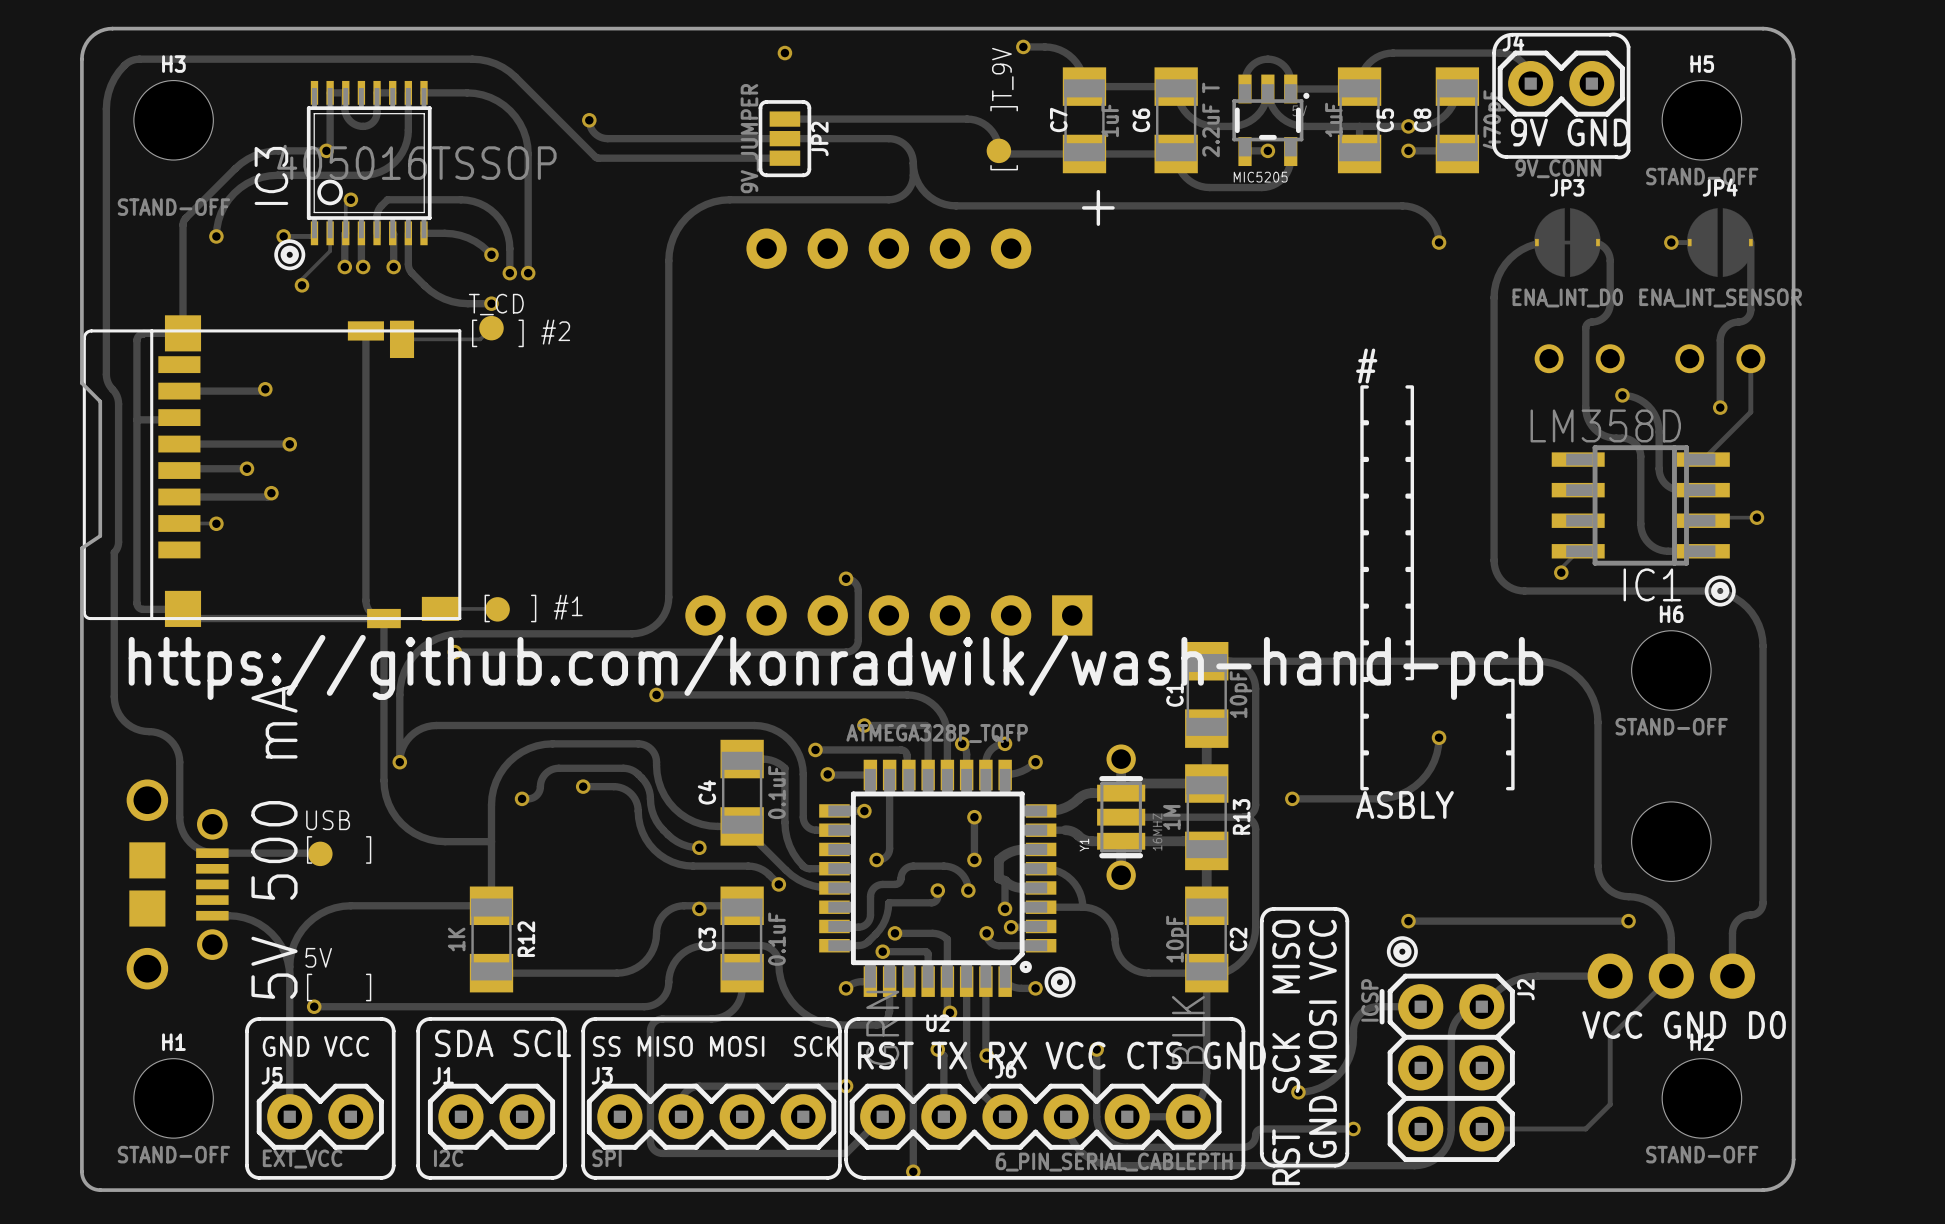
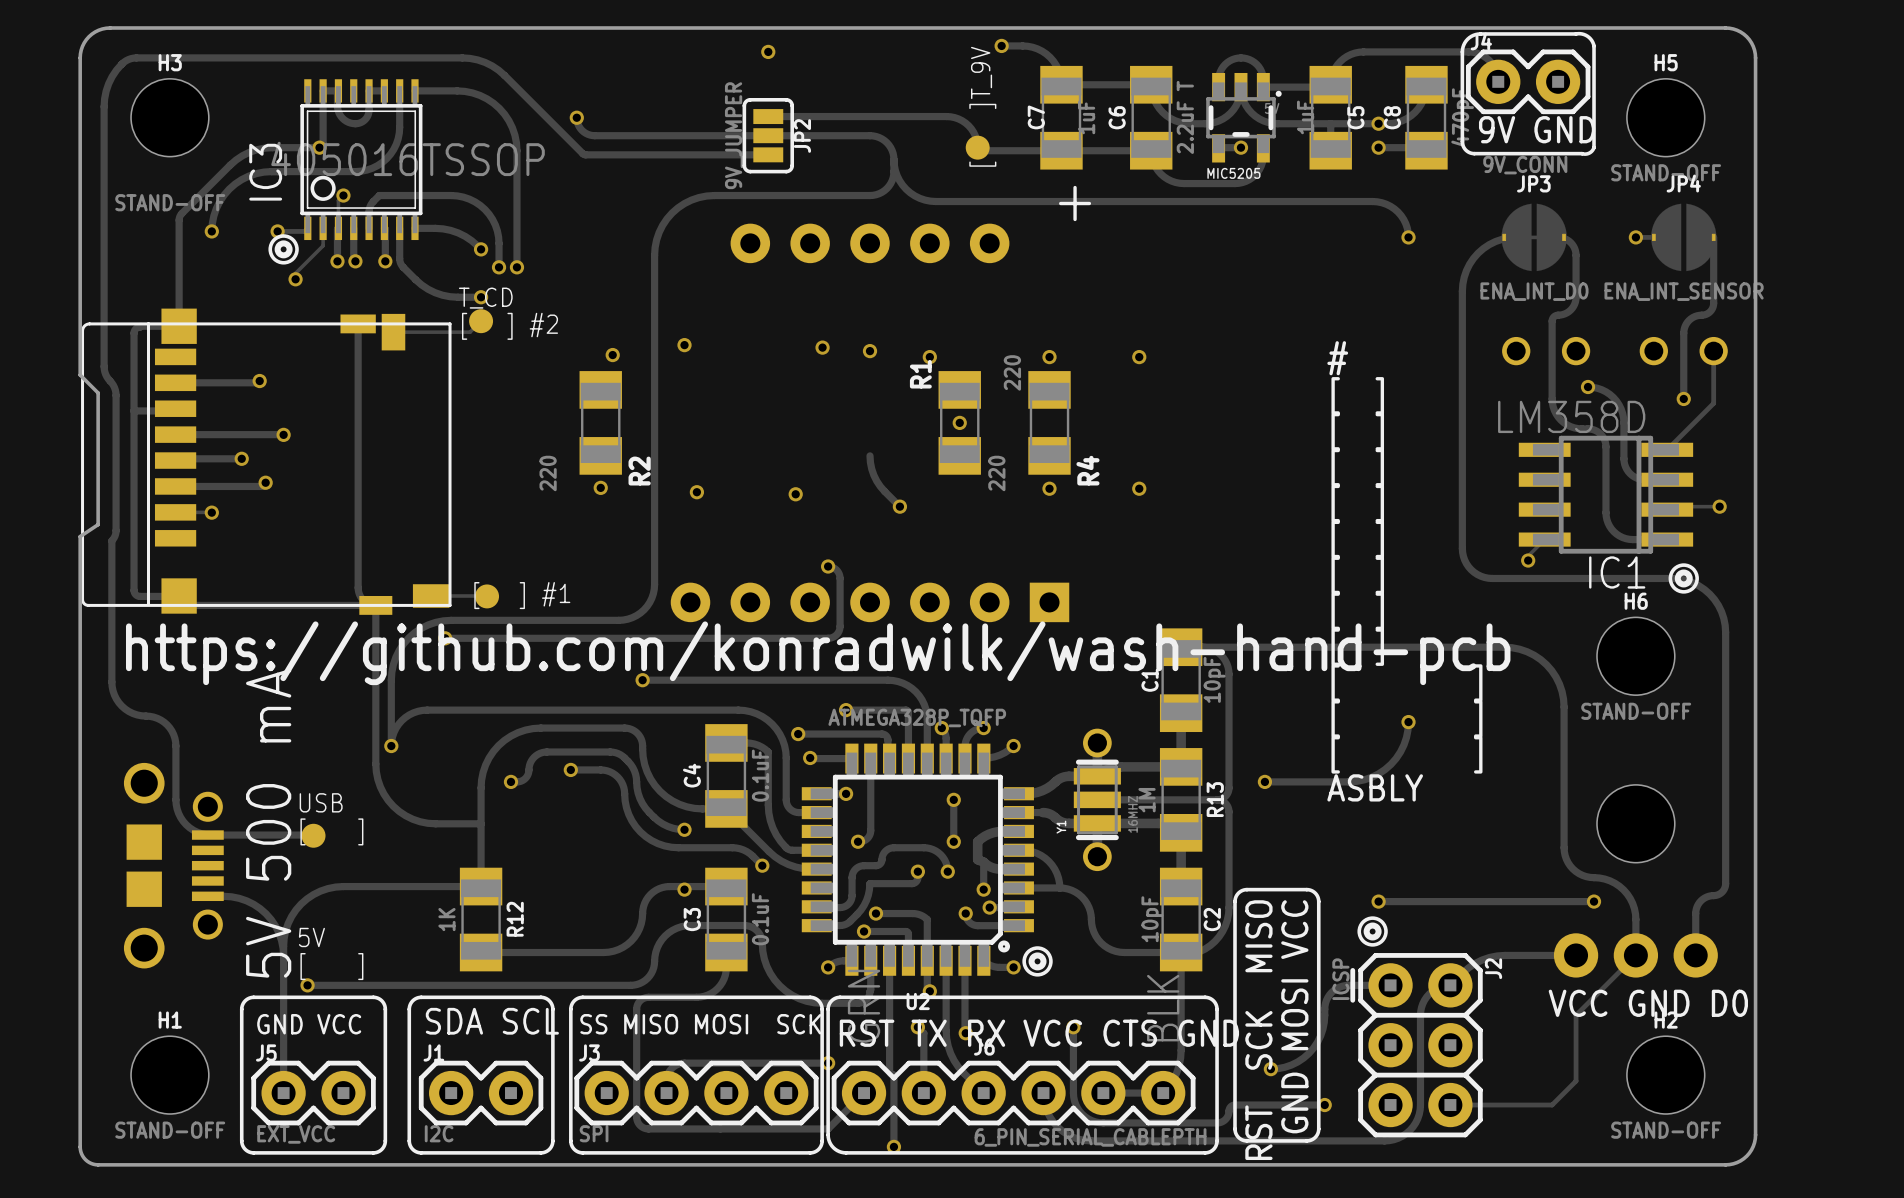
via: none -> (684, 345)
via: none -> (822, 347)
via: none -> (870, 351)
via: none -> (612, 355)
via: none -> (929, 357)
via: none -> (1049, 357)
via: none -> (1139, 357)
R2: none -> 220 (600, 422)
R1: none -> 220 (959, 422)
via: none -> (959, 422)
R4: none -> 220 (1049, 422)
track: none -> (870, 455) (871, 468) (876, 481) (899, 506)
via: none -> (600, 487)
via: none -> (1049, 488)
via: none -> (1139, 488)
via: none -> (696, 492)
via: none -> (795, 494)
via: none -> (899, 506)

